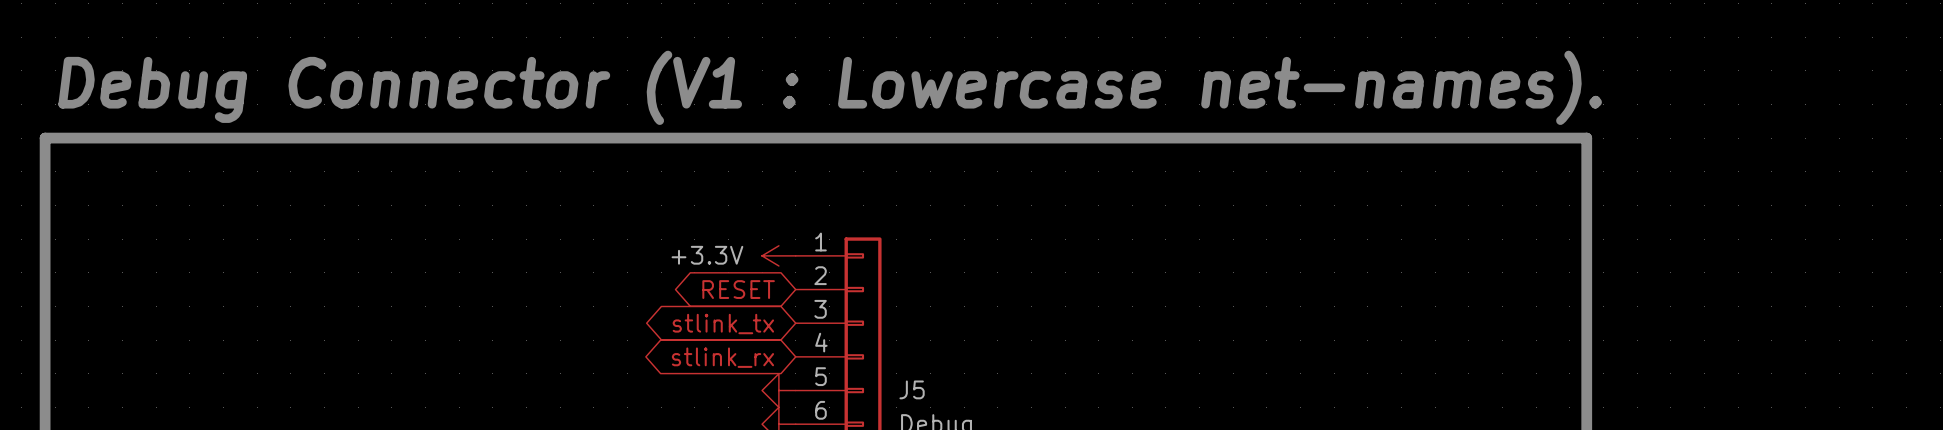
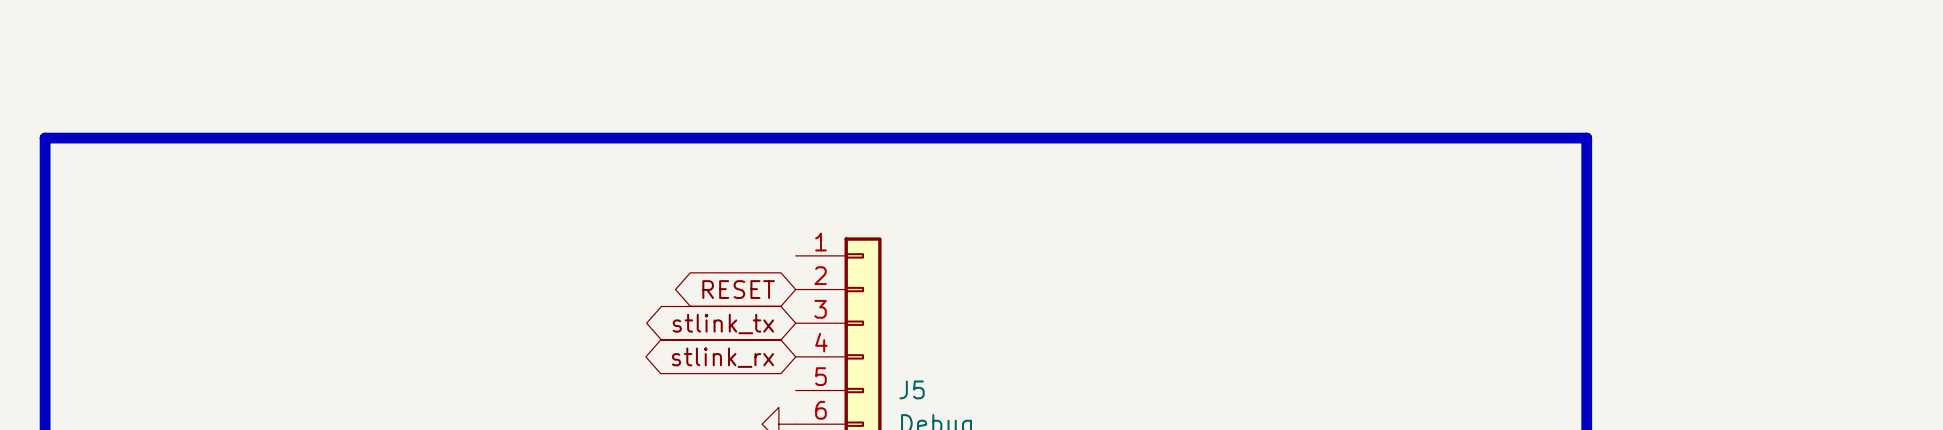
text: Debug Connector (V1 : Lowercase net-names). (830, 87) -> none
power symbol: +3.3V (778, 255) -> none
power symbol: (778, 390) -> none

